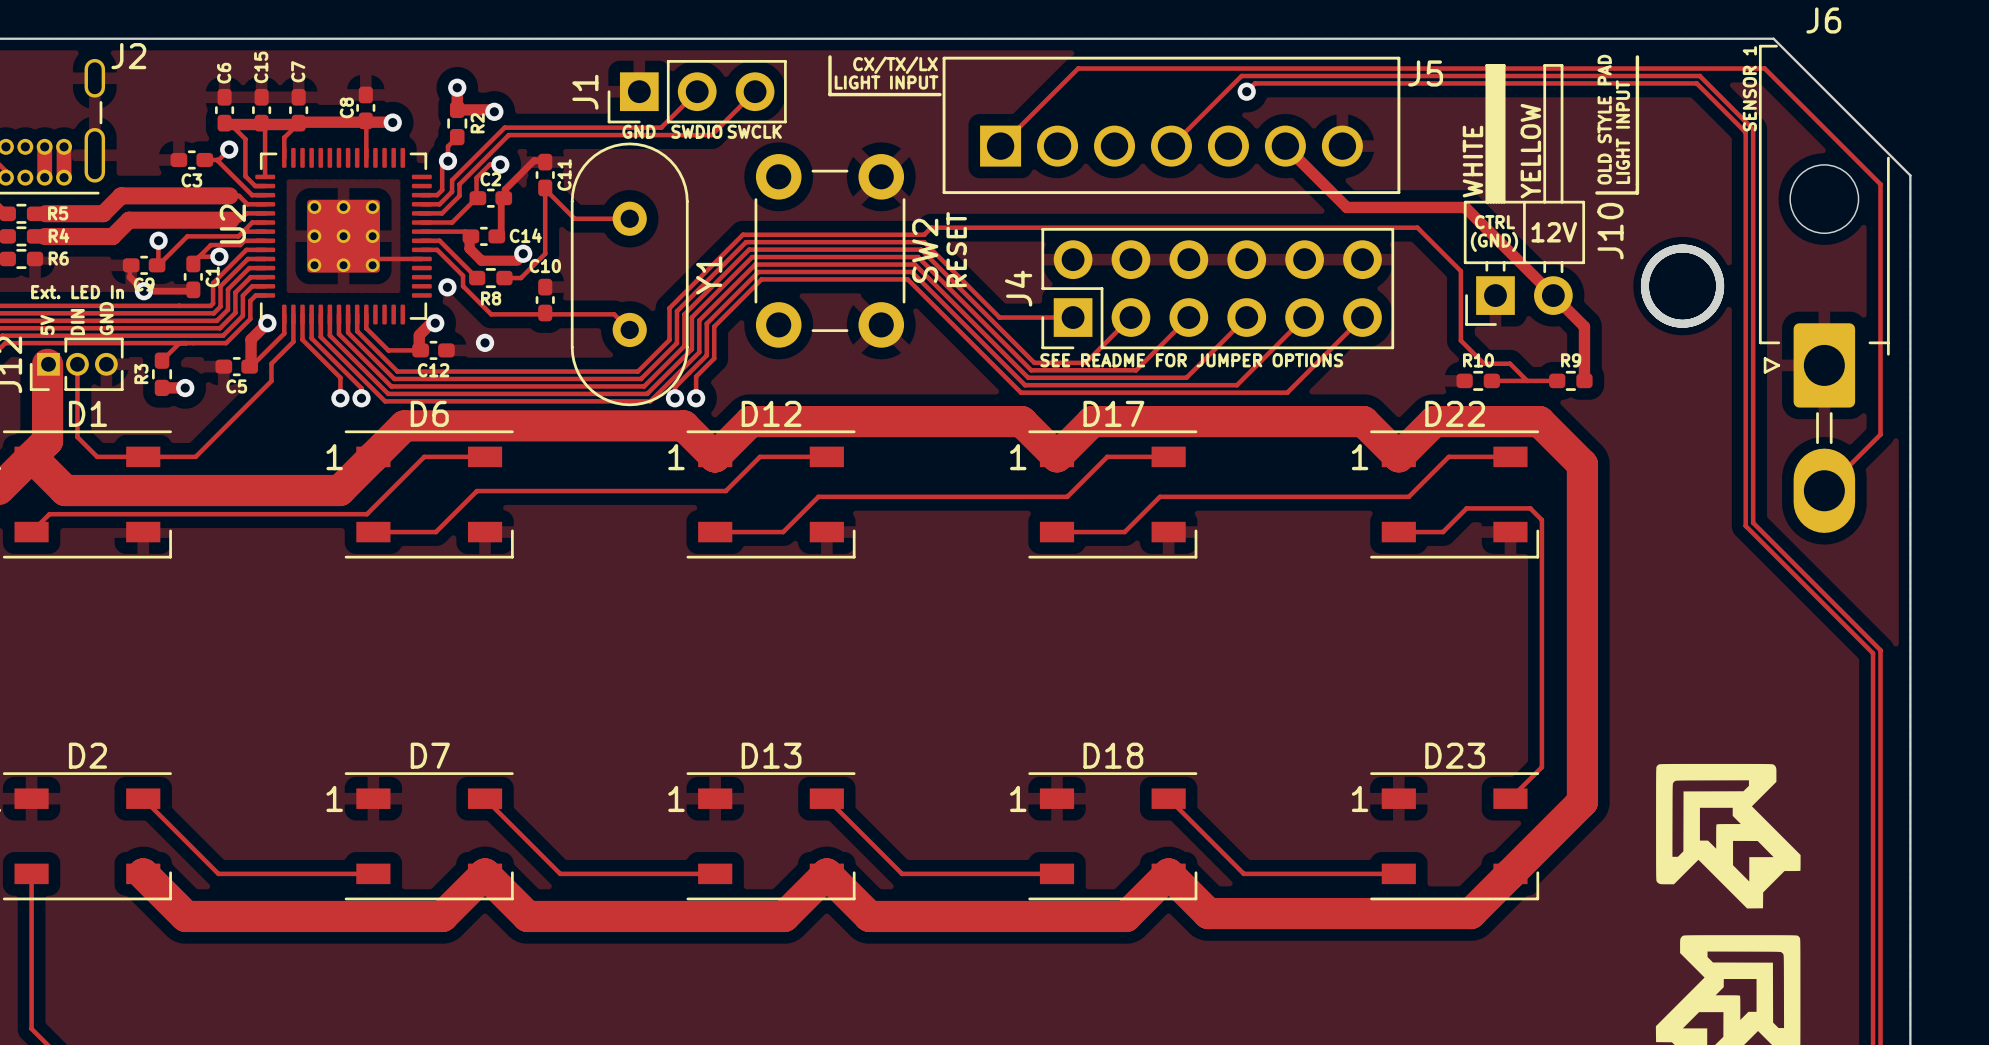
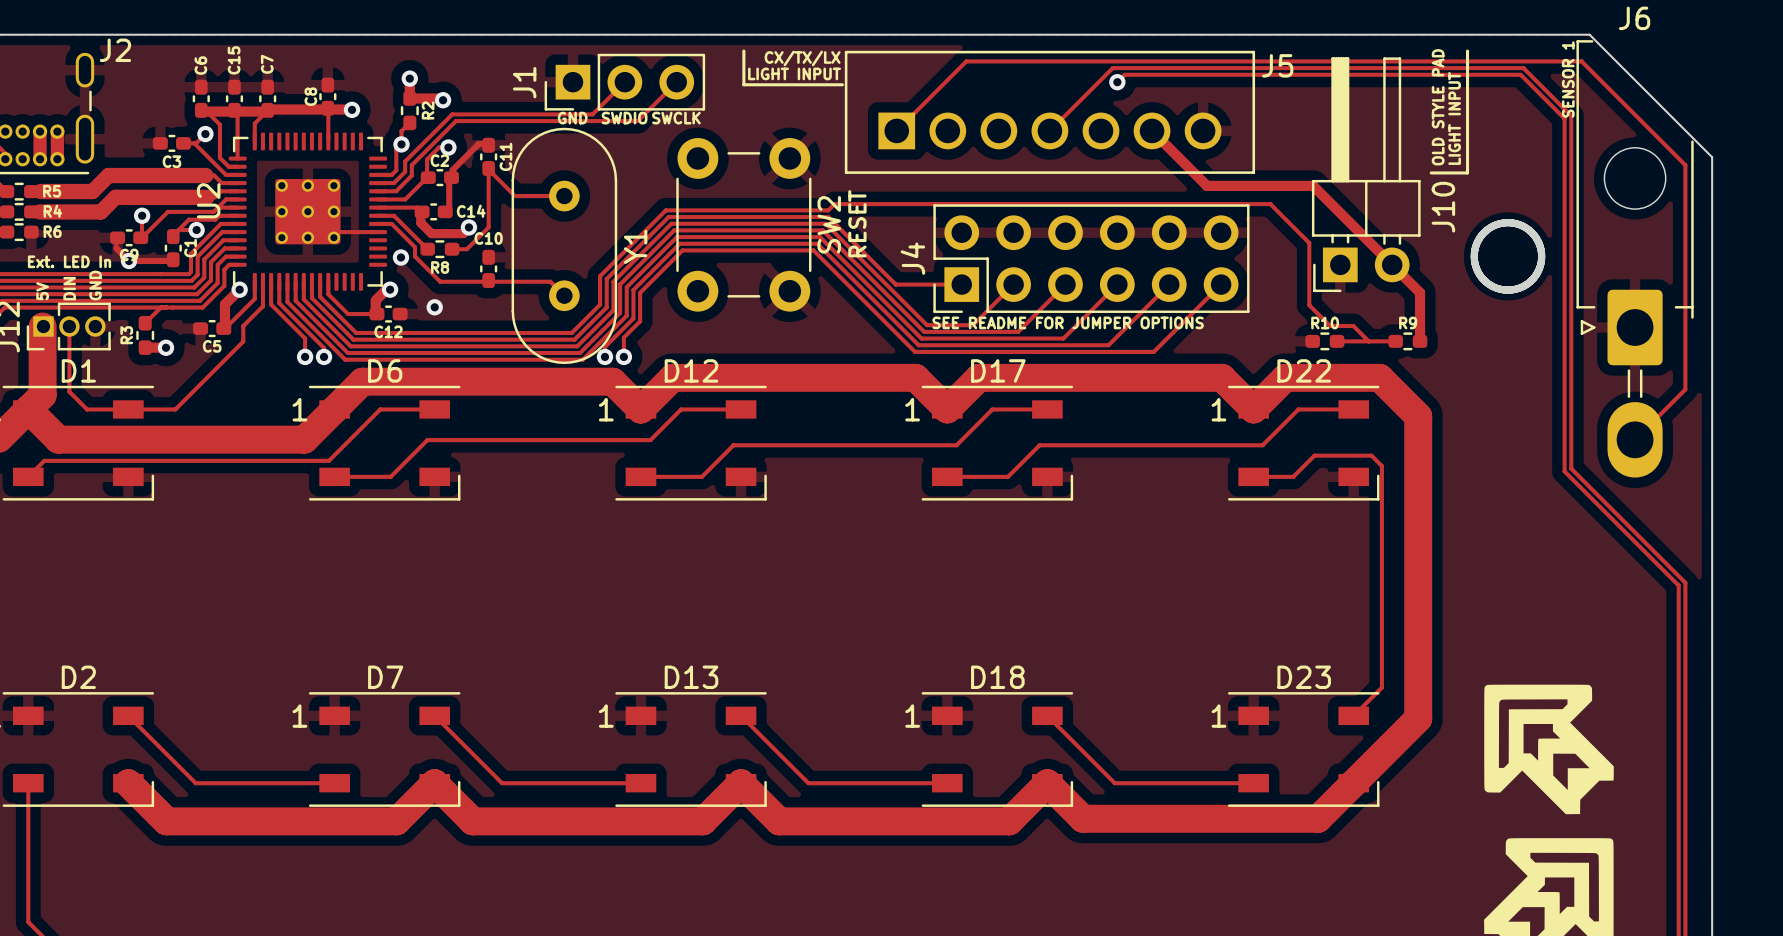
text: YELLOW (1530, 151) -> none
text: WHITE (1472, 161) -> none
text: CTRL (1494, 222) -> none
text: 12V (1554, 232) -> none
text: (GND) (1494, 241) -> none

